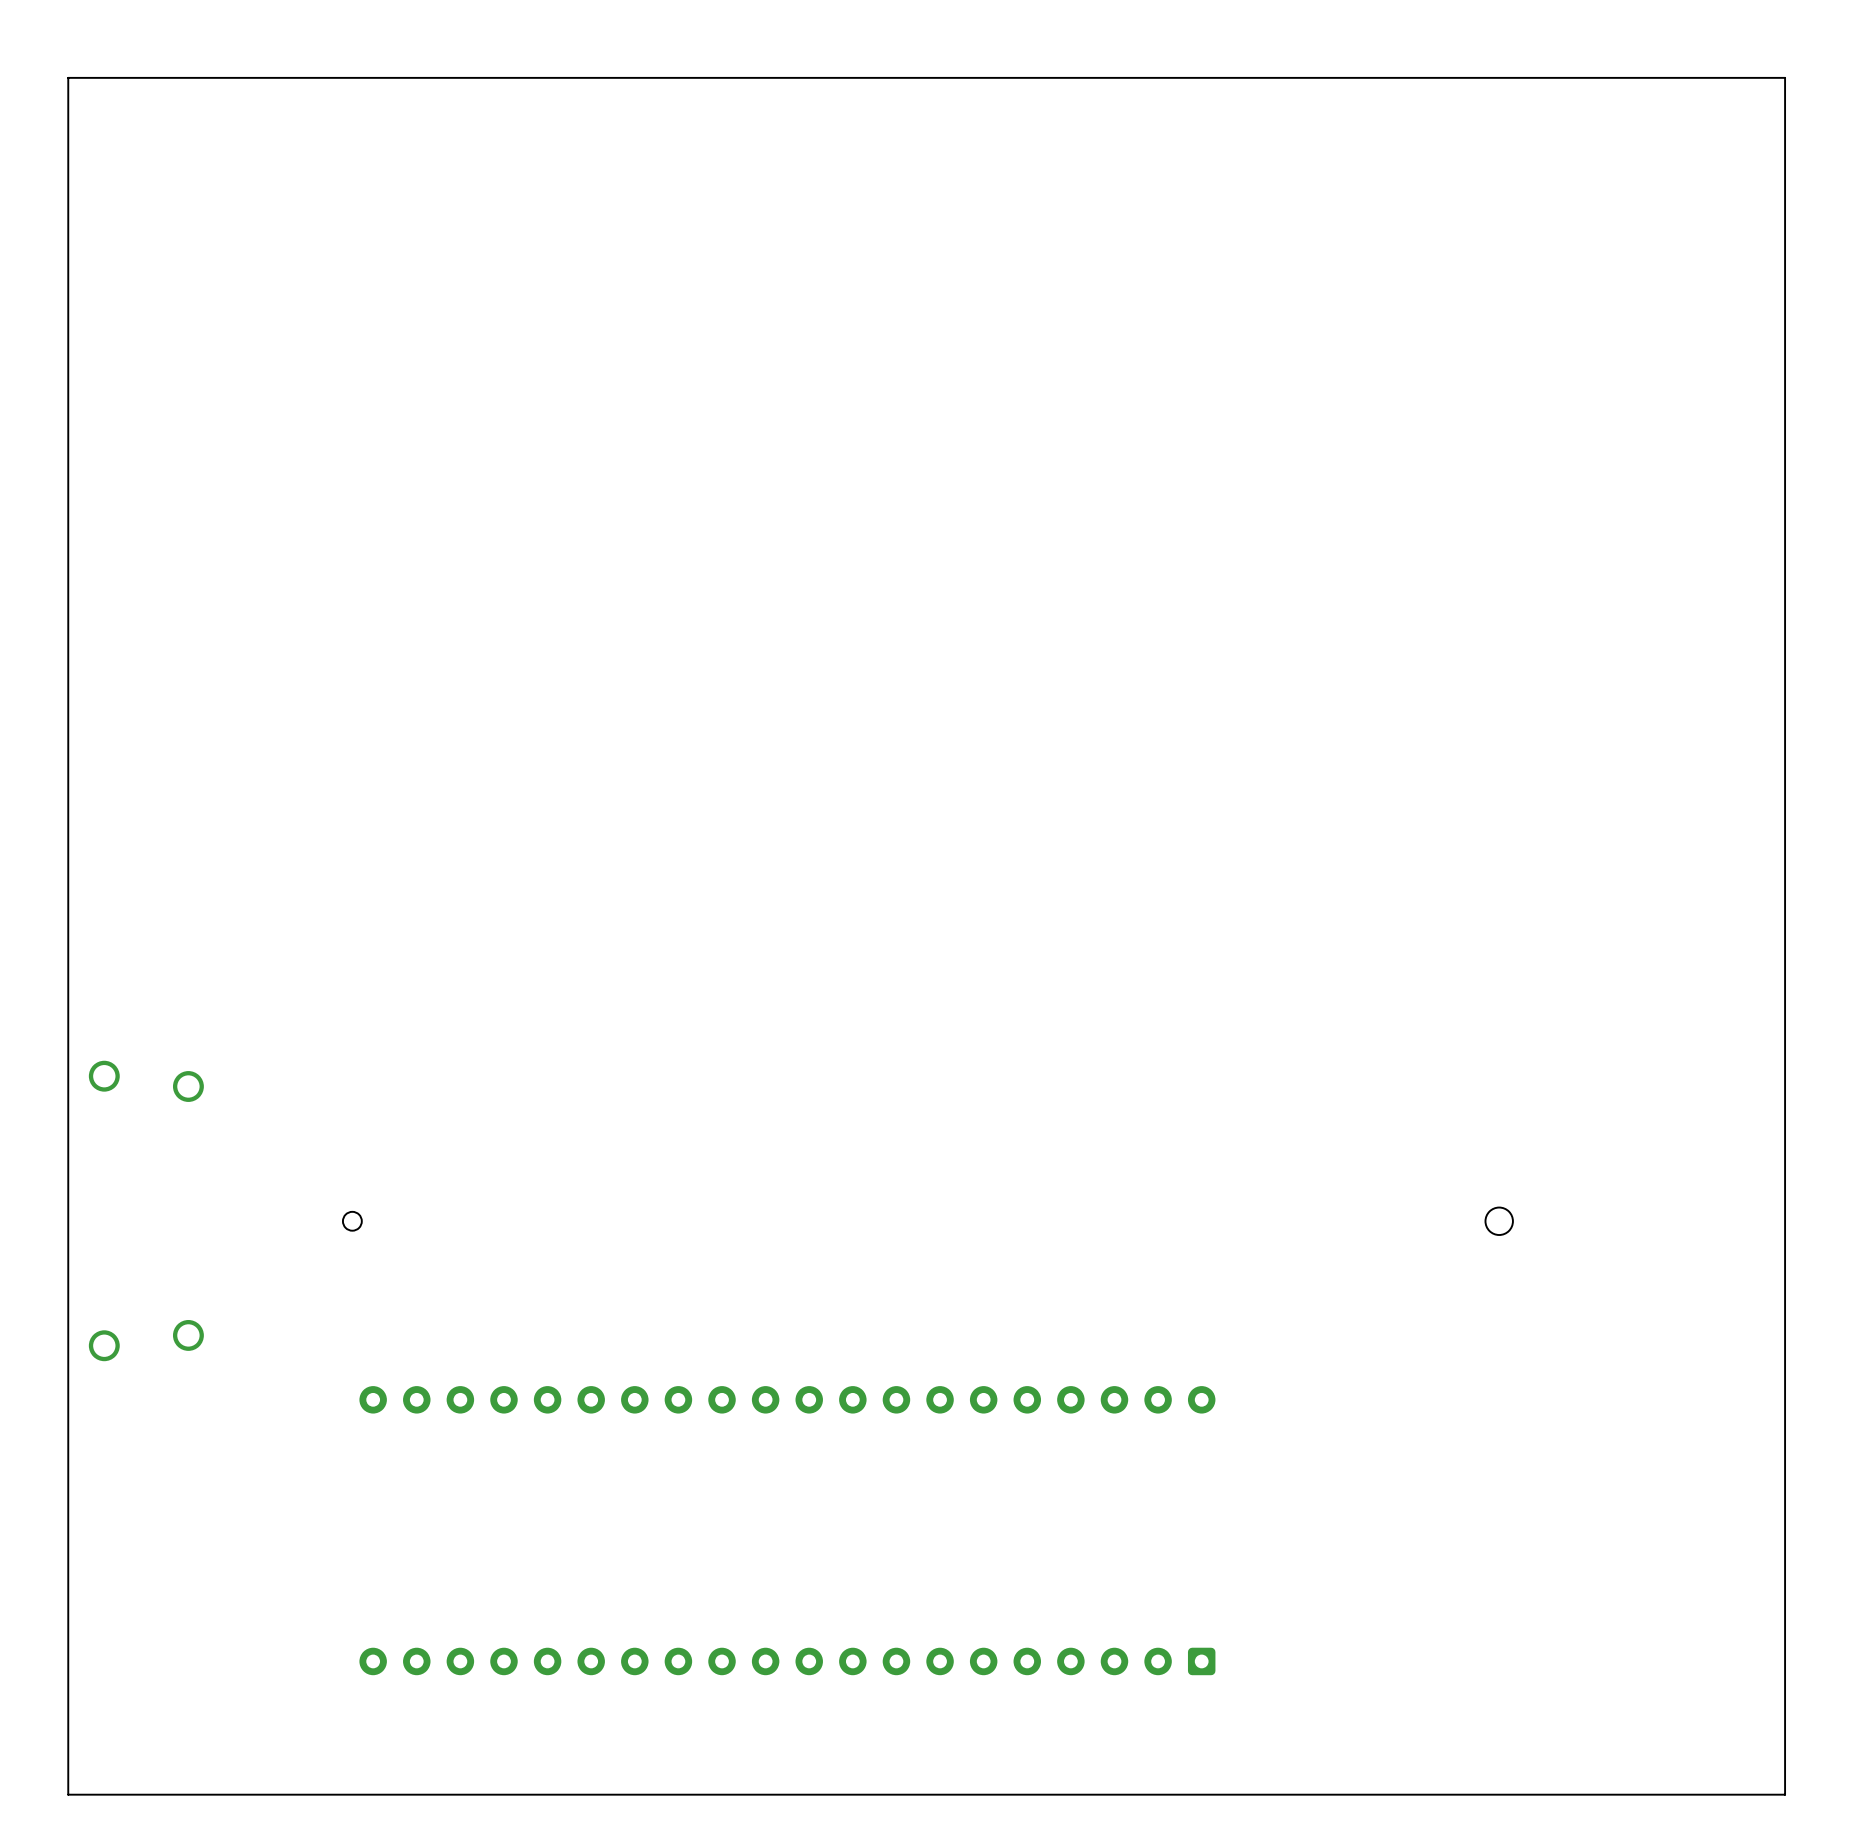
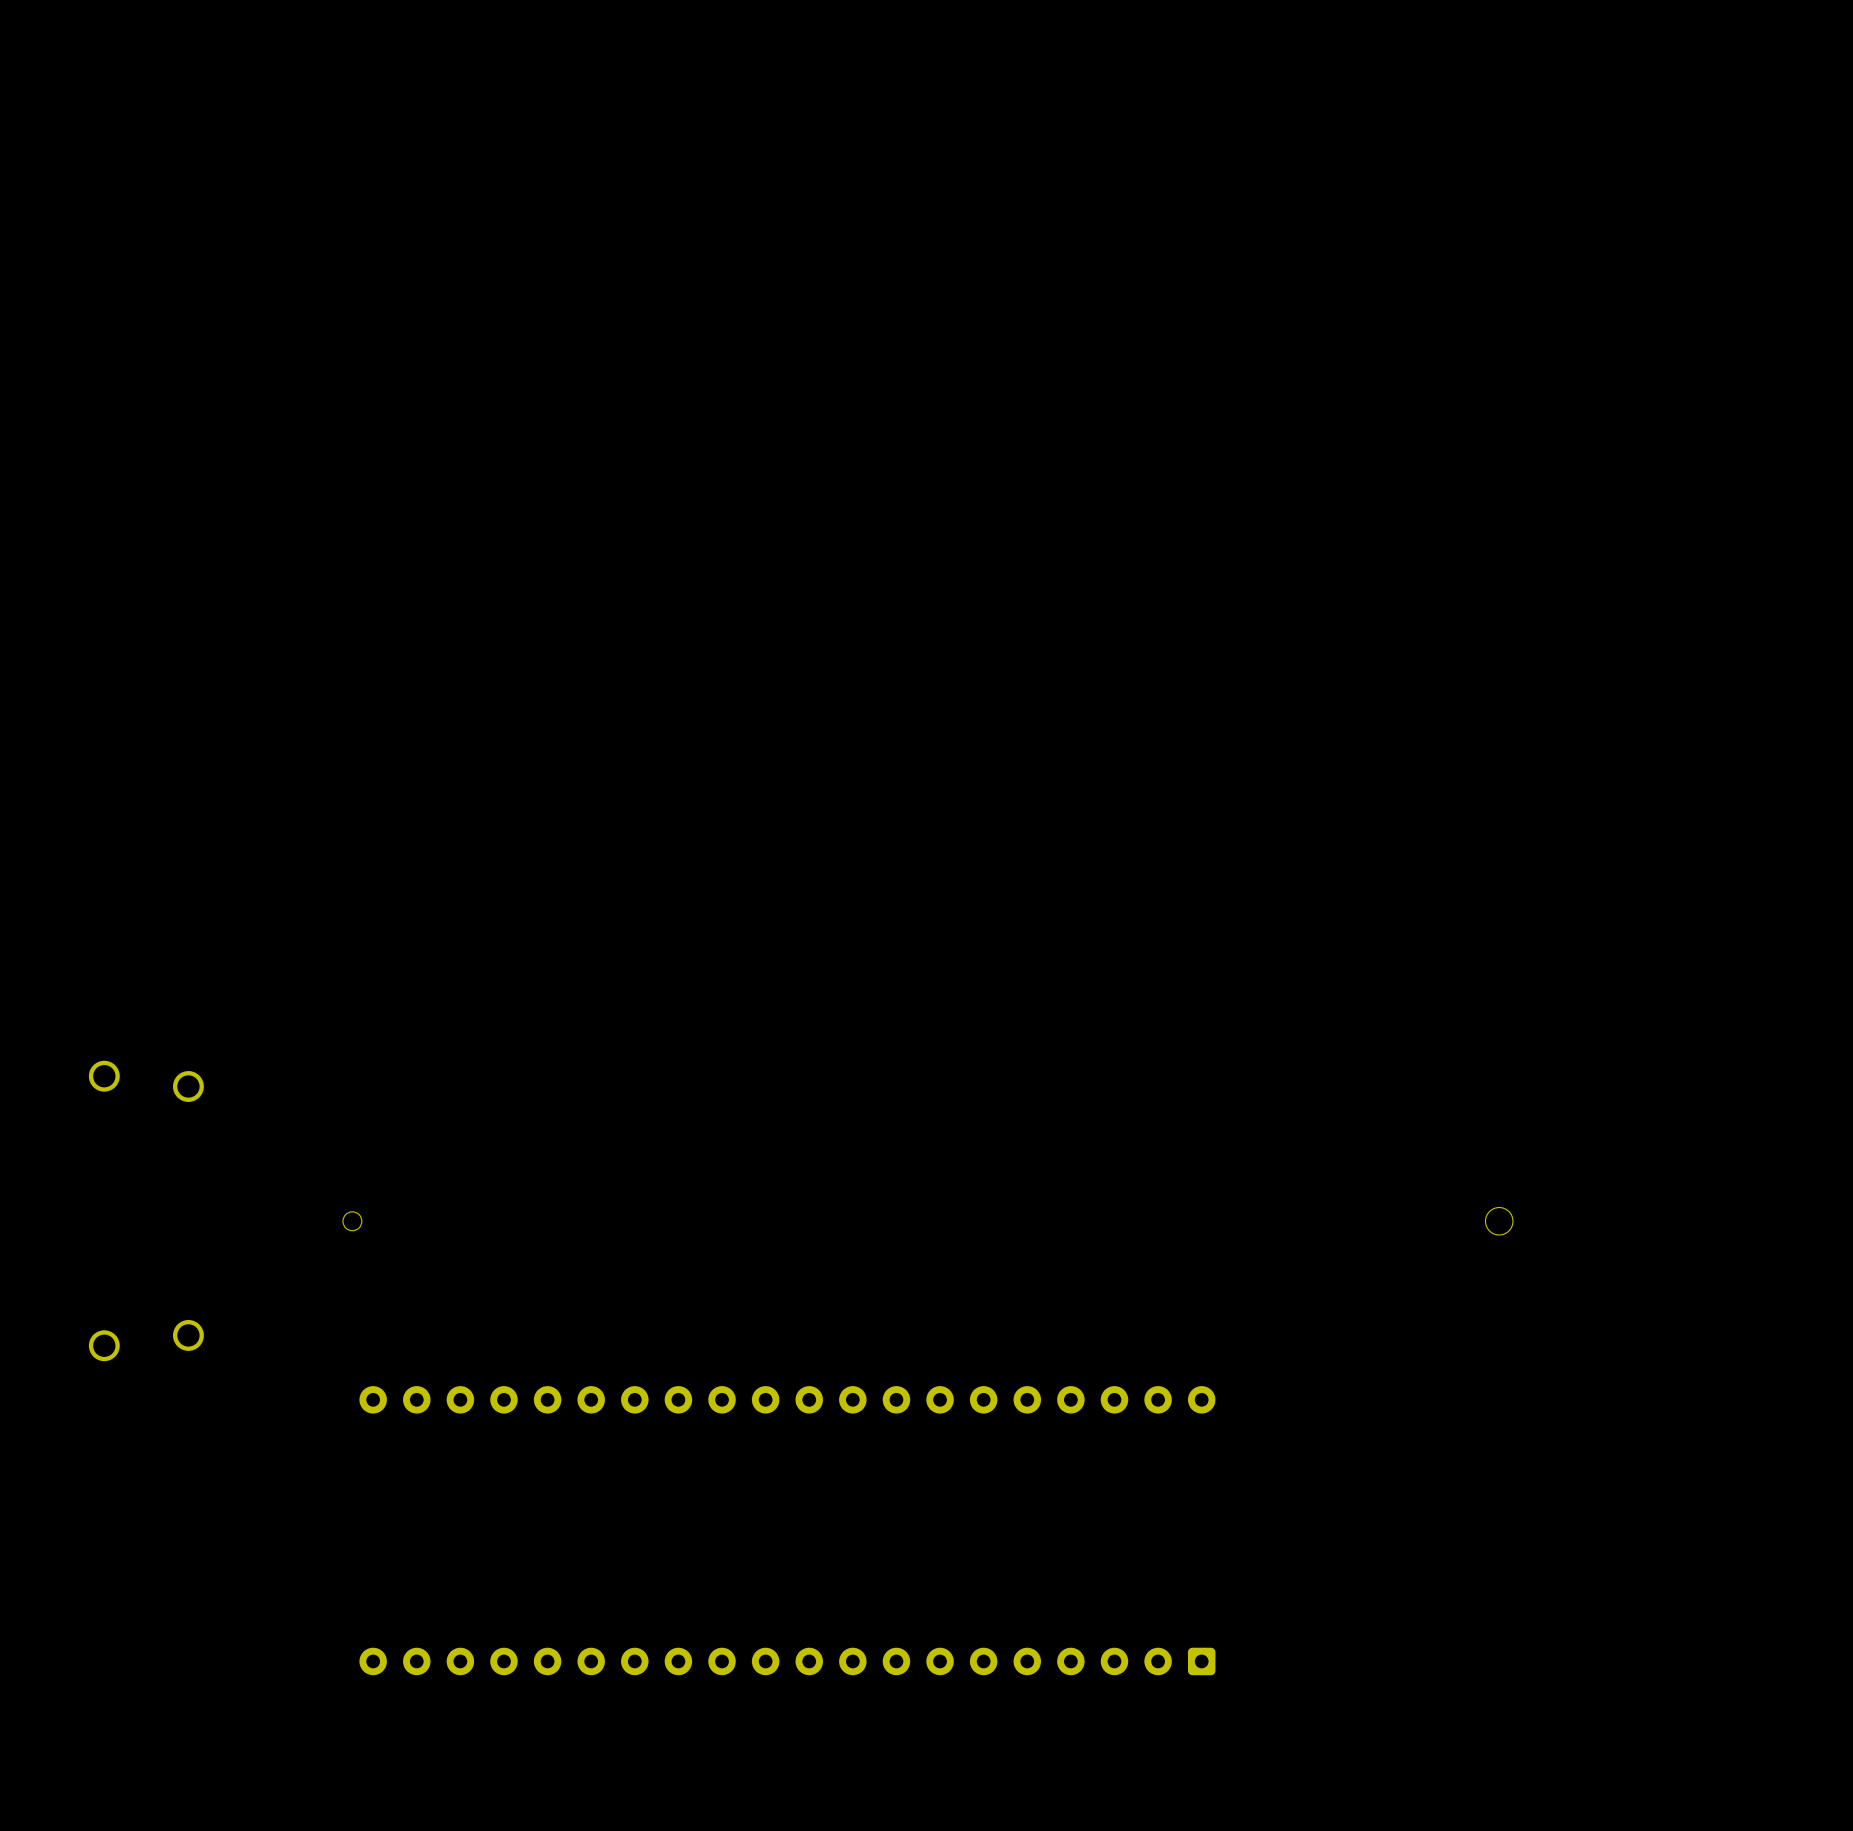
board edge: (1785, 77) (68, 77) (68, 1794) (1785, 1794) (1785, 77) -> none

